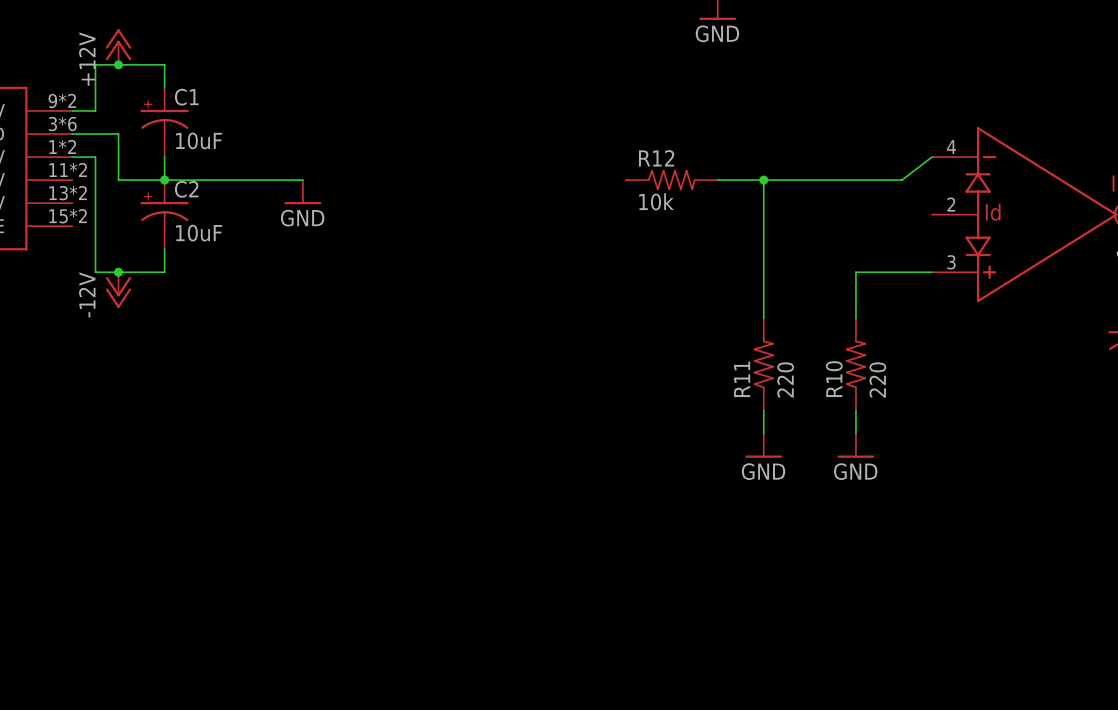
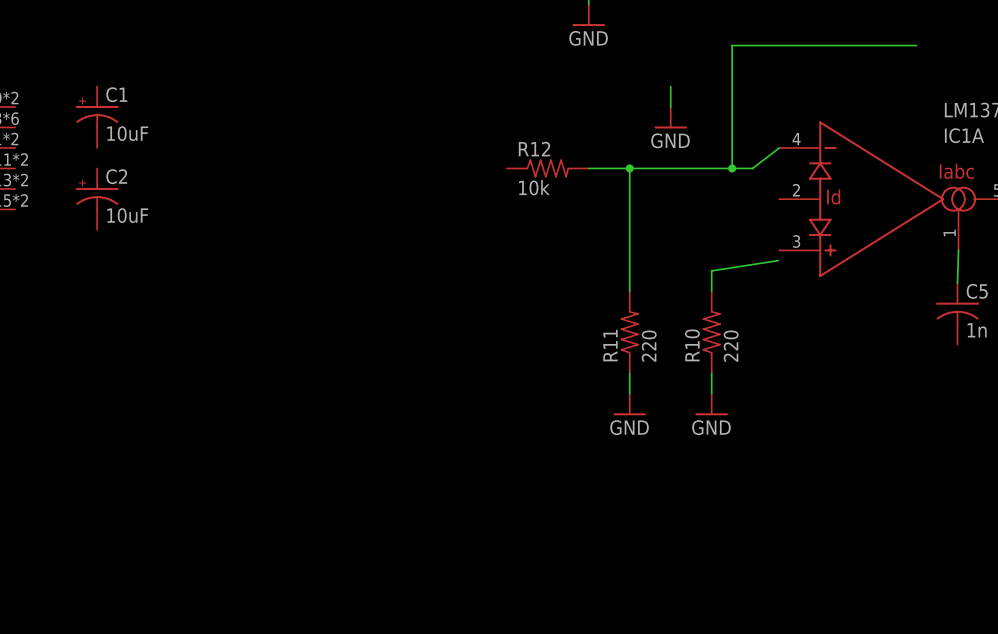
wire: none -> (916, 45) (732, 45) (732, 168)
power symbol: +12V (118, 47) -> none
junction: (118, 64) -> none
wire: (164, 87) (164, 64) (95, 64) (95, 110) (72, 110) -> none
wire: none -> (670, 86) (670, 107)
power symbol: none -> GND (670, 117)
wire: (72, 134) (118, 134) (118, 180) (302, 180) -> none
wire: (72, 157) (95, 157) (95, 272) (164, 272) (164, 249) -> none
wire: (164, 157) (164, 180) -> none
junction: (164, 180) -> none
junction: none -> (732, 168)
power symbol: GND (302, 192) -> none
junction: (118, 272) -> none
wire: (932, 272) (855, 272) (855, 295) -> (778, 260) (711, 270)
power symbol: -12V (118, 290) -> none

